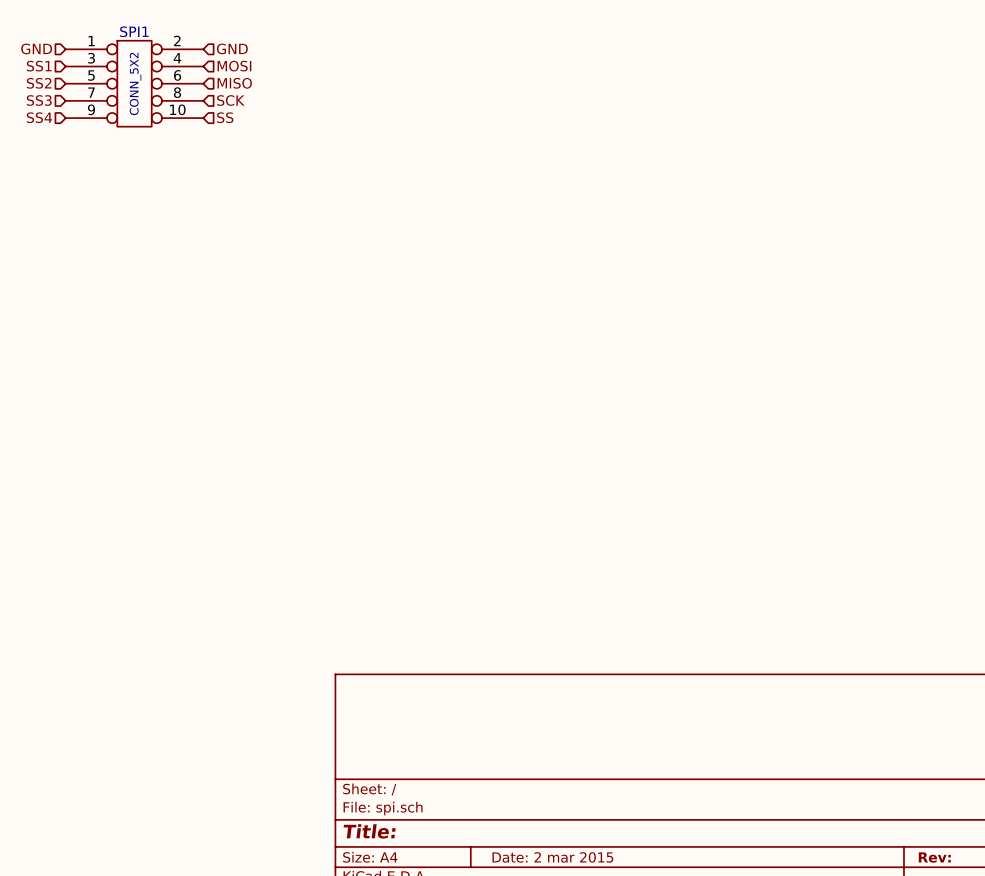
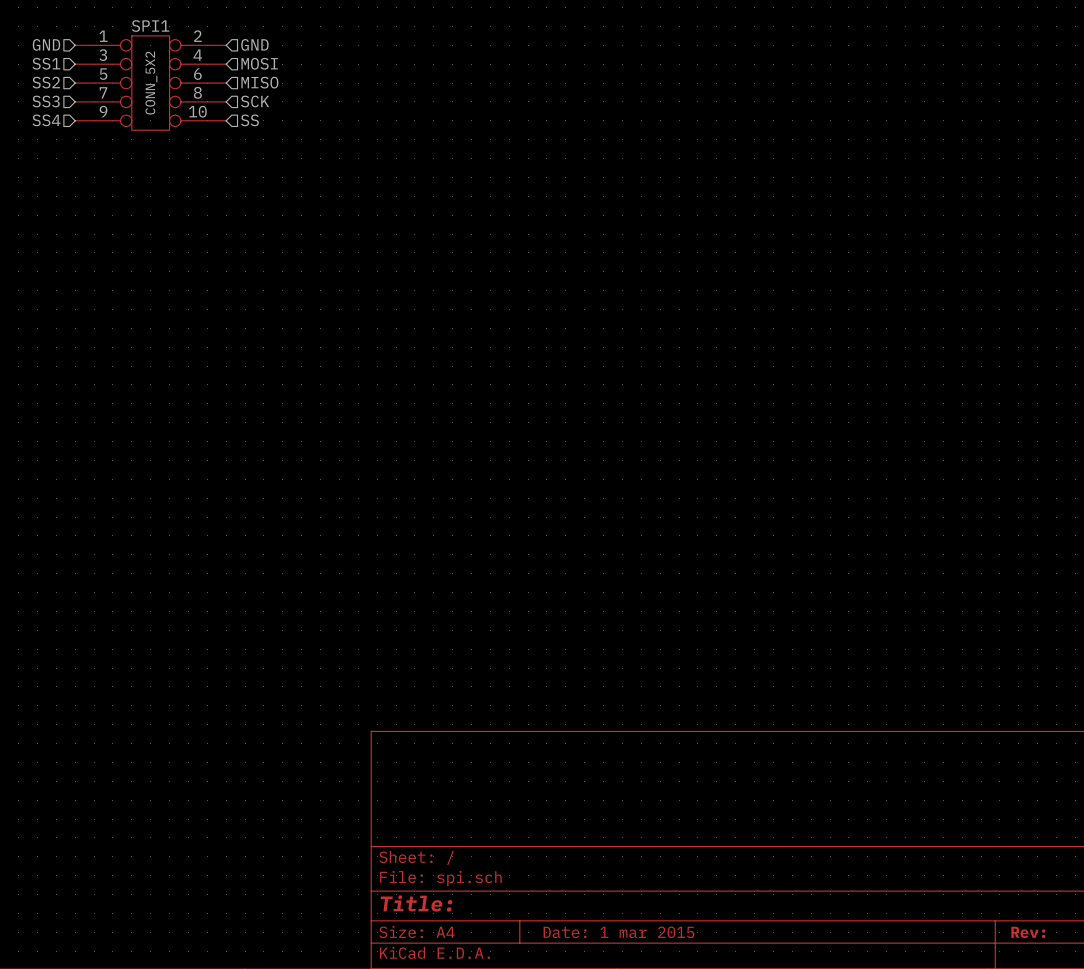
title block: Date: 2 mar 2015 (552, 857) -> Date: 1 mar 2015 (618, 932)

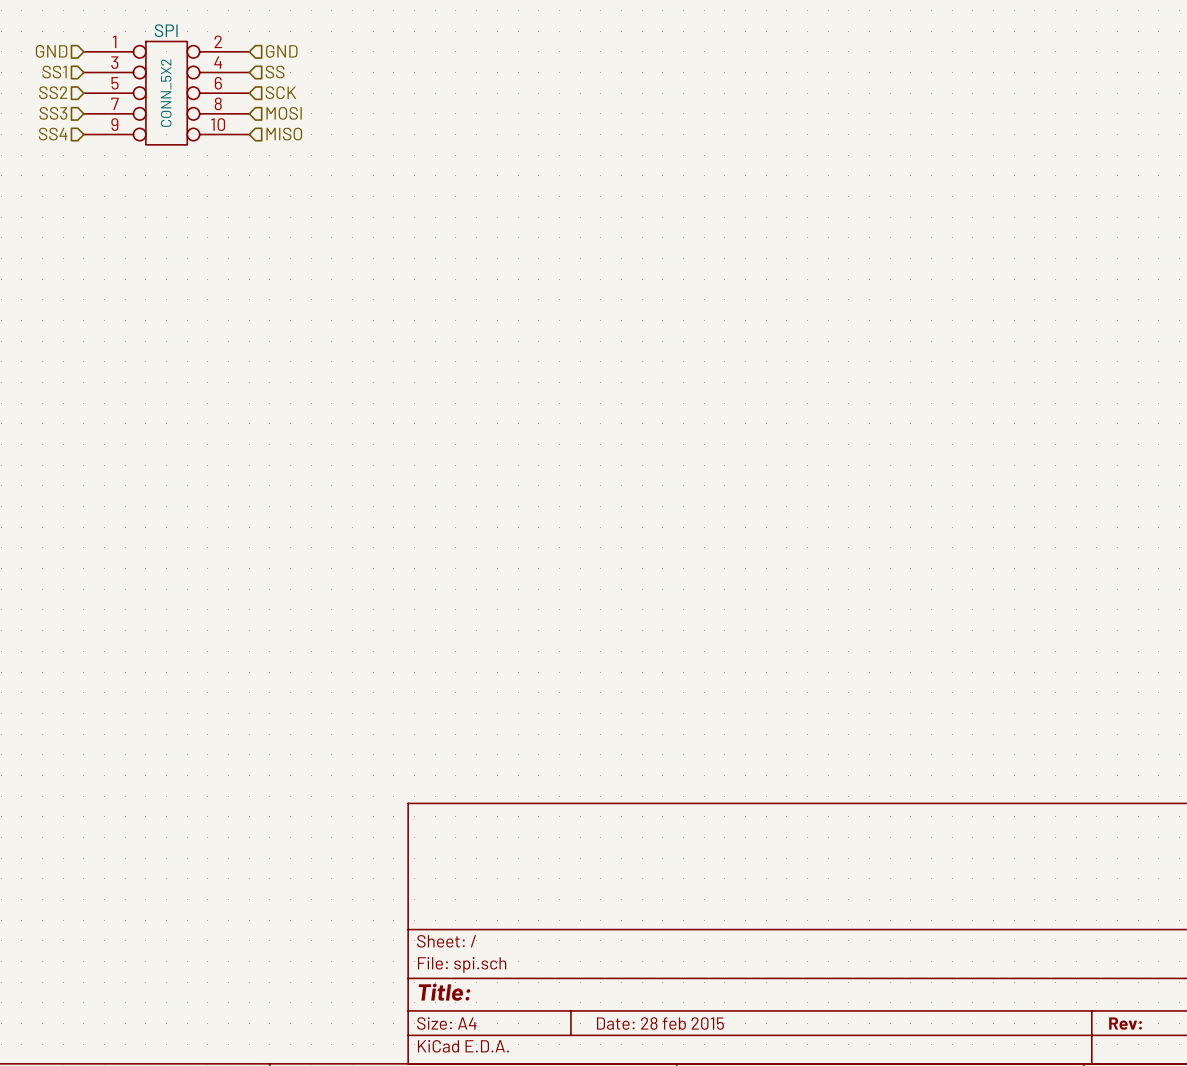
SPI1 name: SPI1 (150, 26) -> SPI (166, 30)
hierarchical label: MOSI (259, 63) -> SS (275, 72)
hierarchical label: MISO (259, 82) -> SCK (280, 92)
hierarchical label: SCK (255, 101) -> MOSI (284, 113)
hierarchical label: SS (249, 120) -> MISO (284, 134)
title block: Date: 1 mar 2015 (618, 932) -> Date: 28 feb 2015 (660, 1023)

